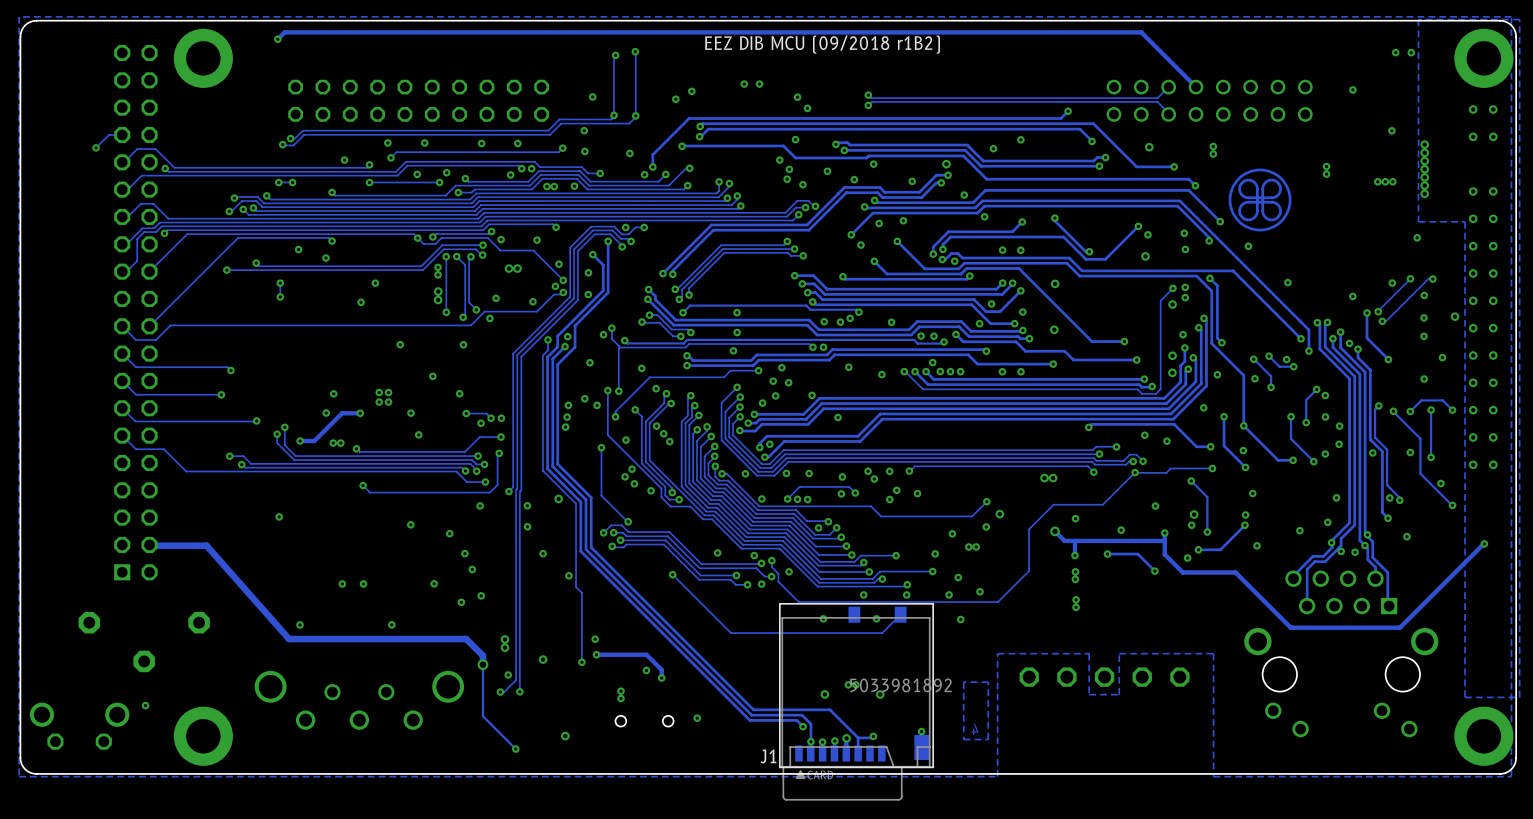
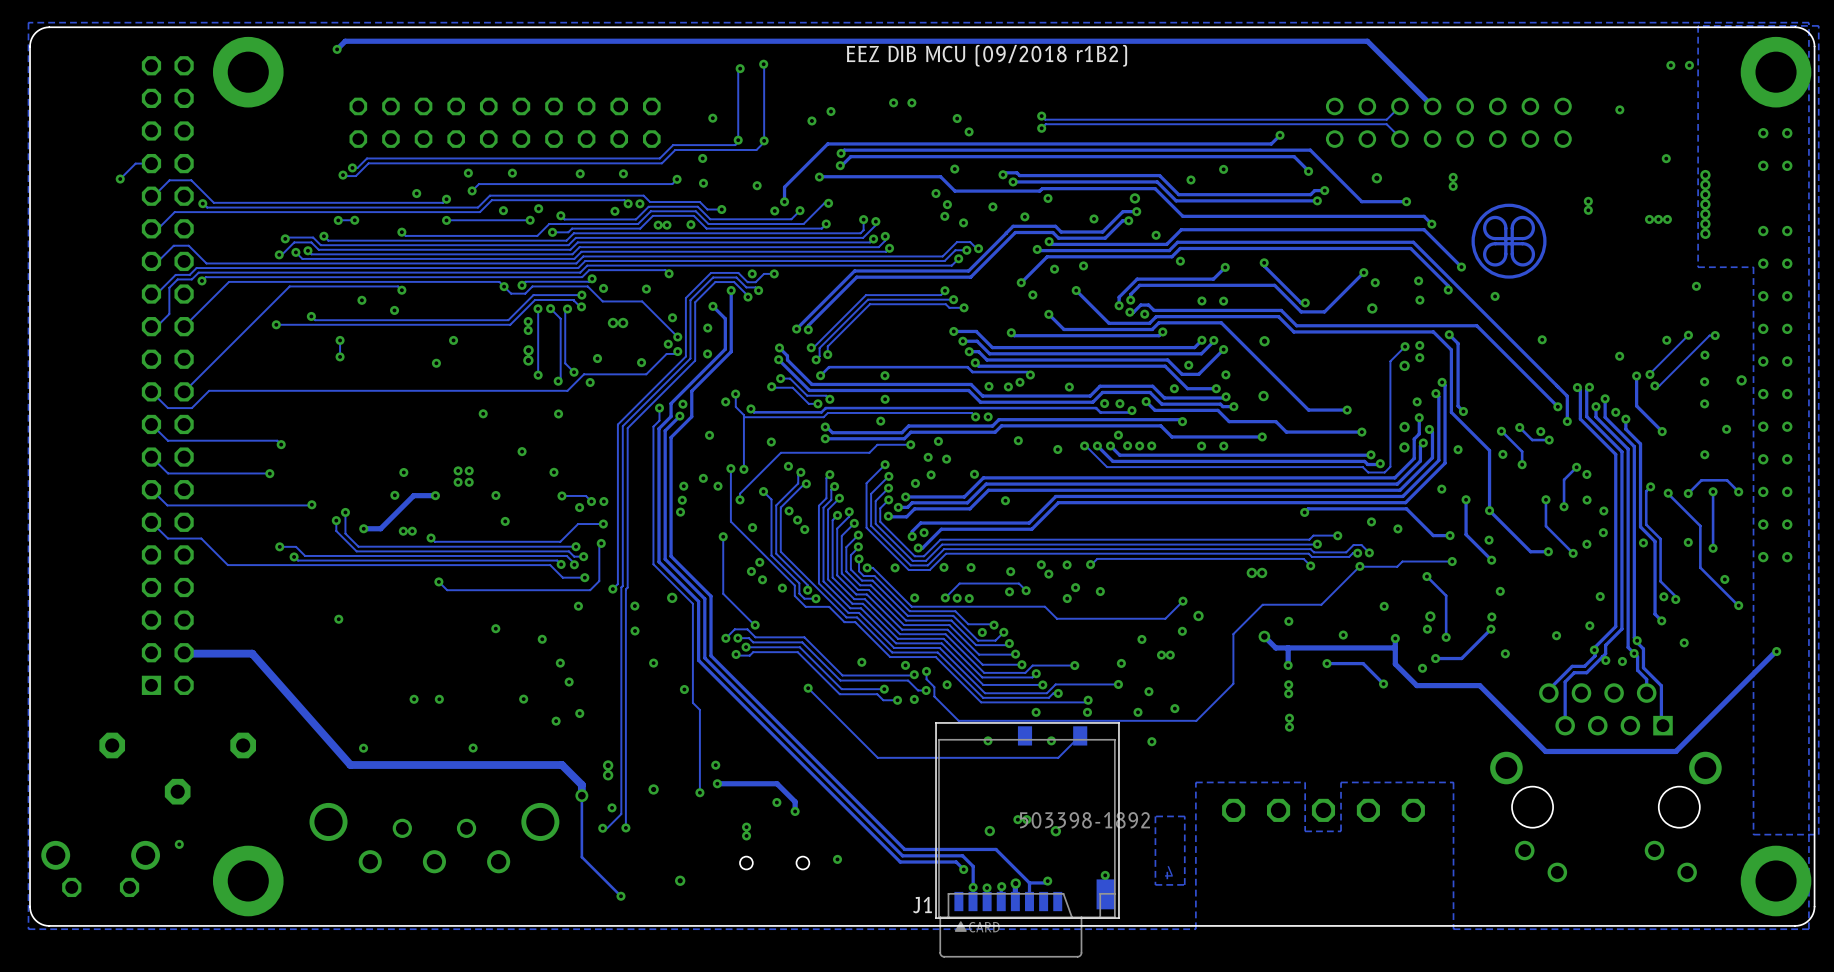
J1 value: 5033981892 (901, 685) -> 503398-1892 (1085, 820)

